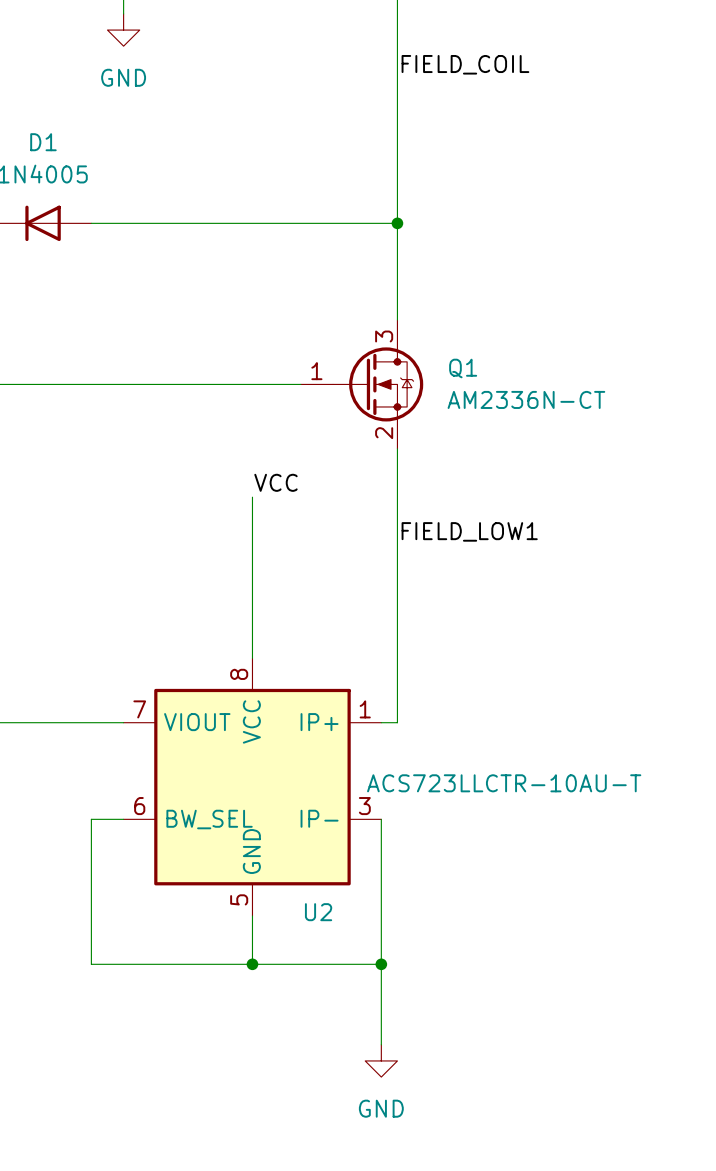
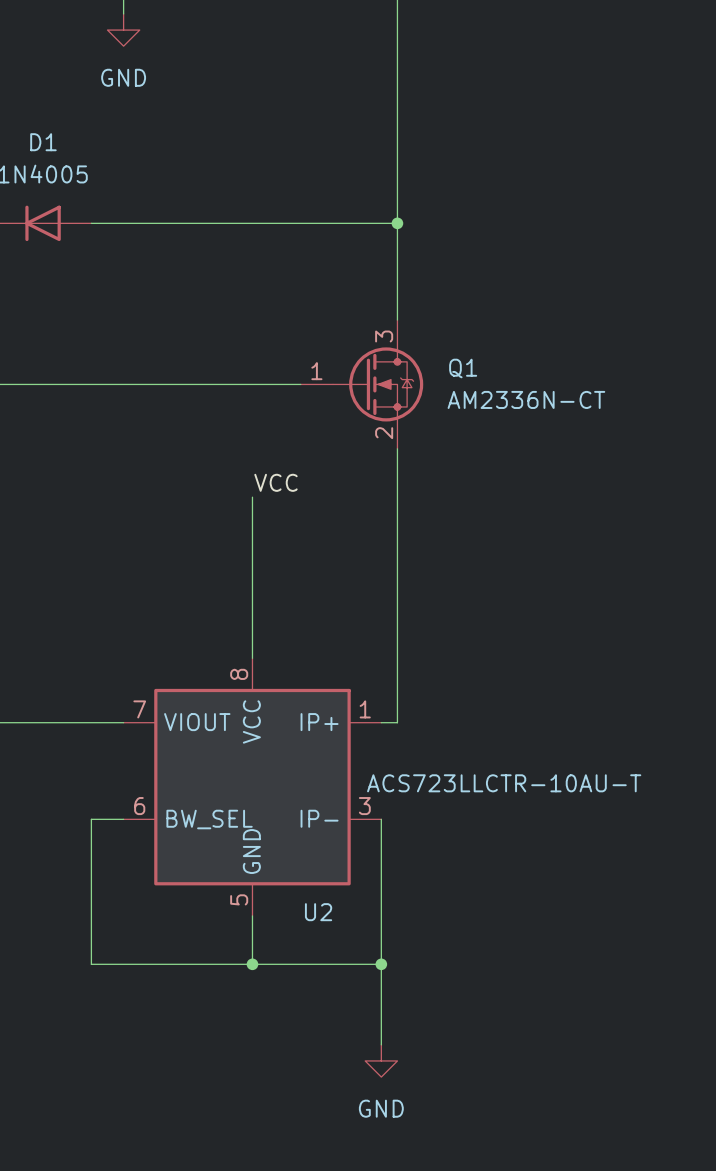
label: FIELD_COIL (465, 64) -> none
label: FIELD_LOW1 (469, 531) -> none

